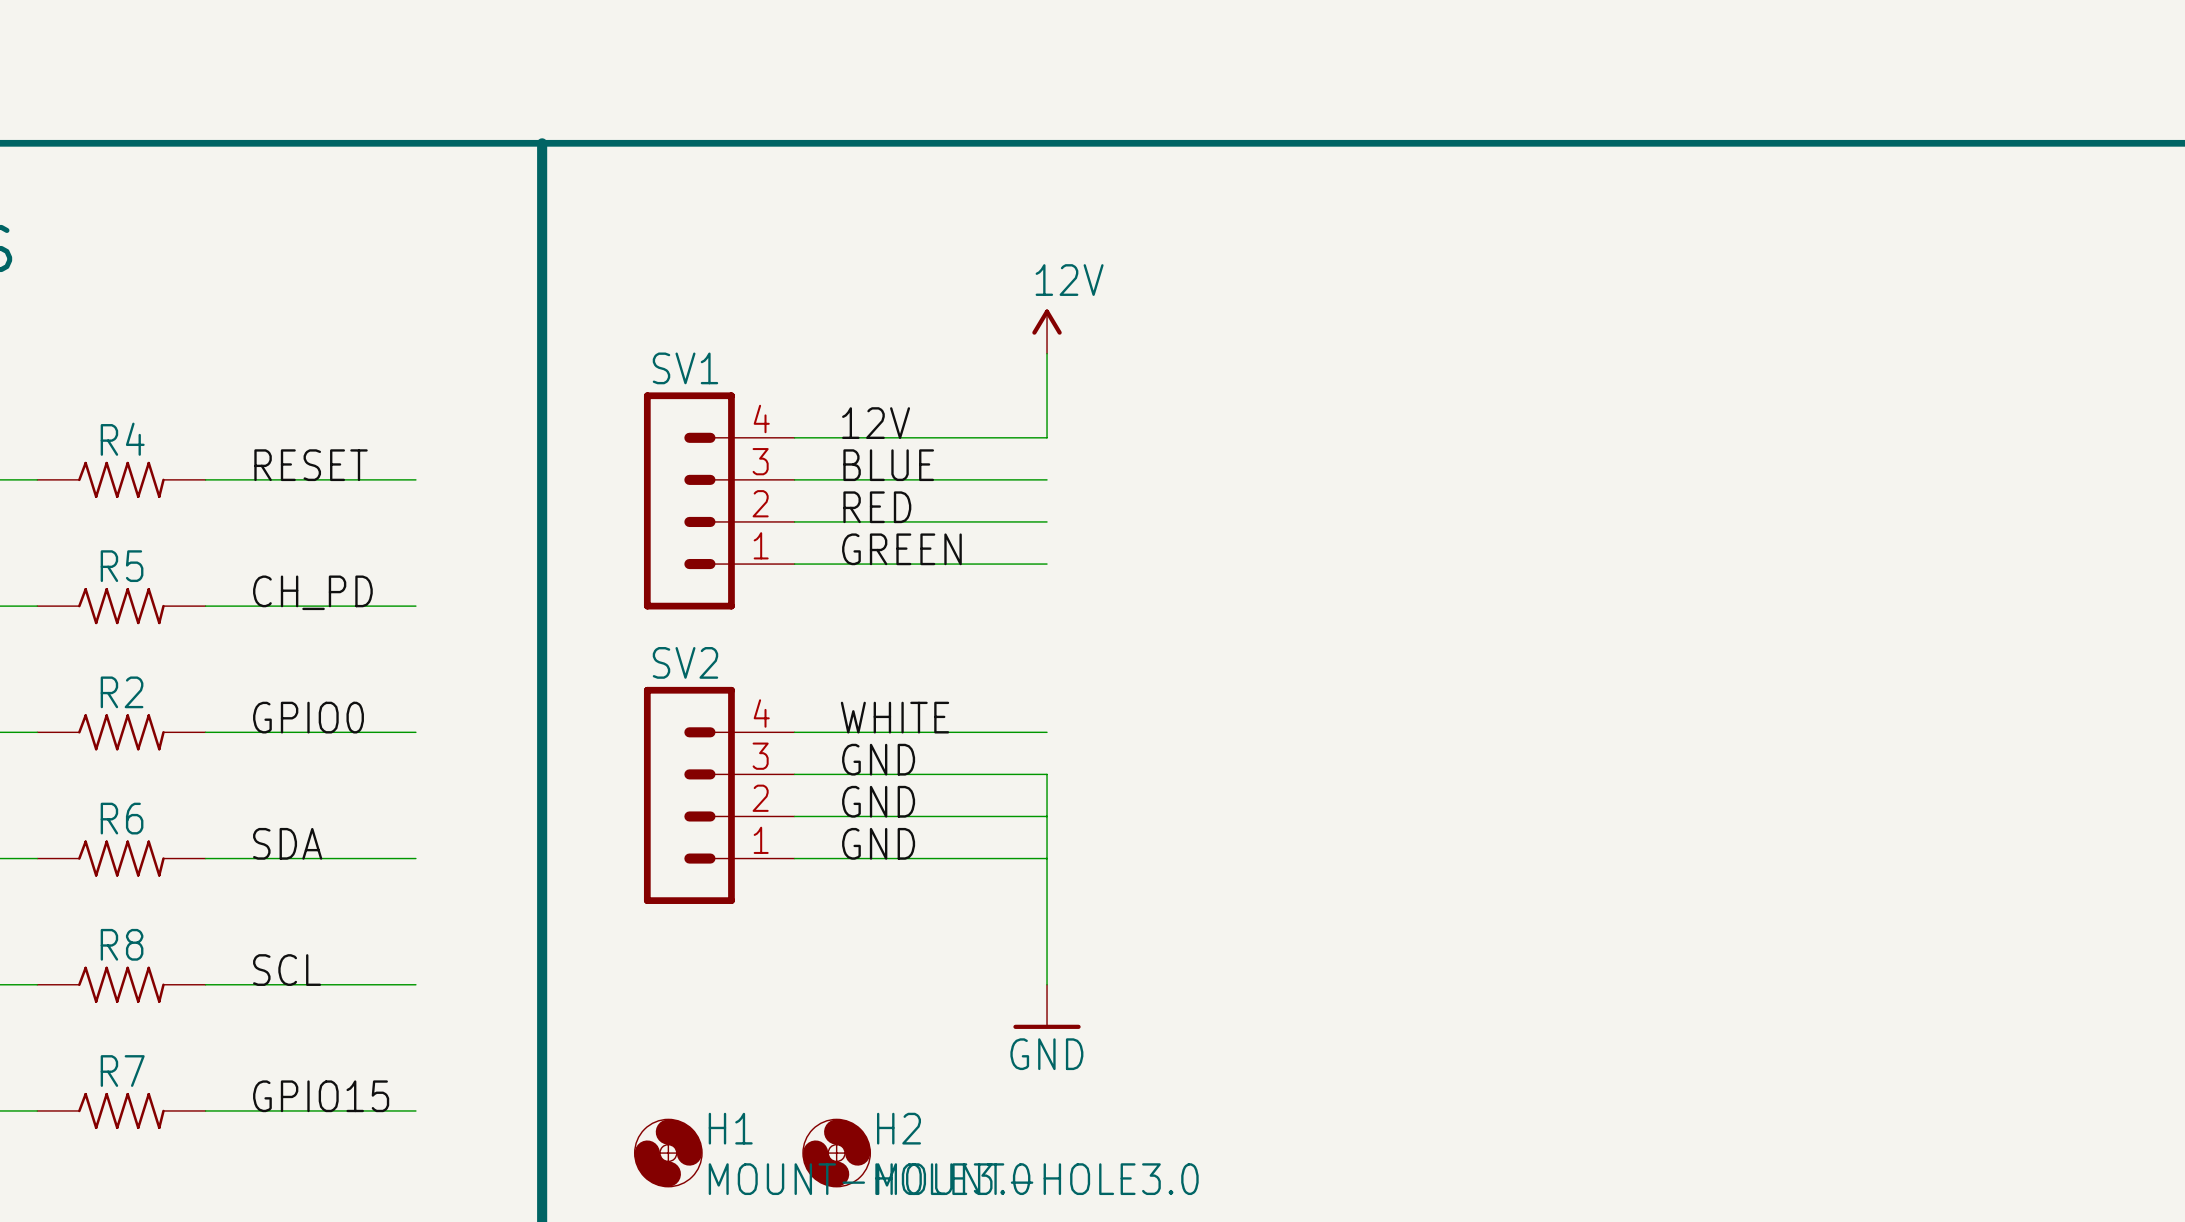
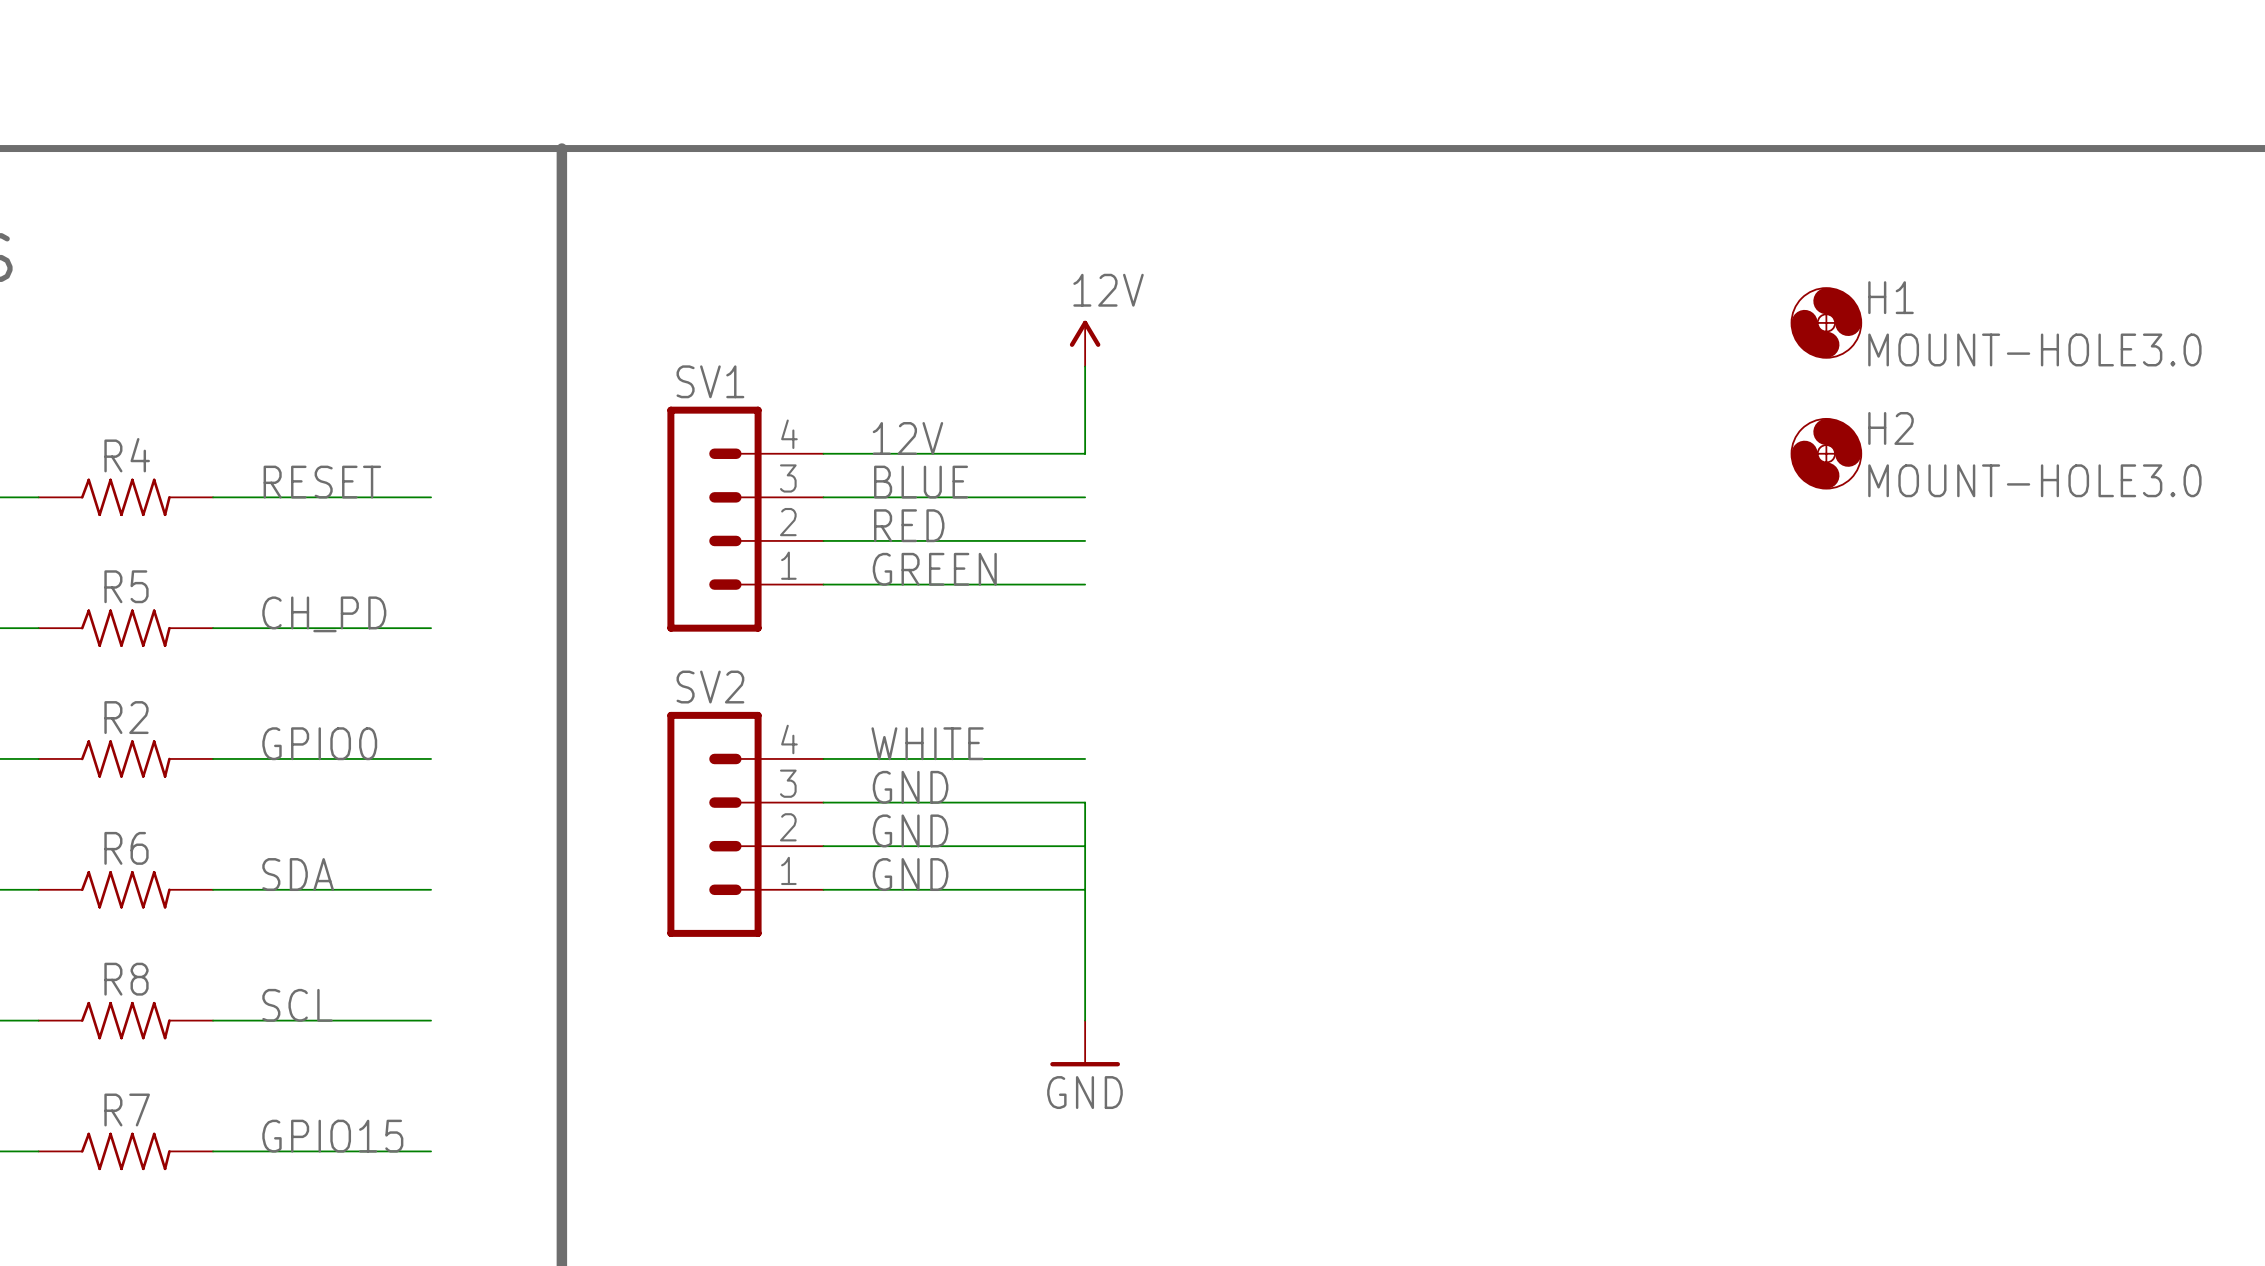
H1 position: (668, 1153) -> (1826, 322)
H2 position: (836, 1153) -> (1826, 453)

